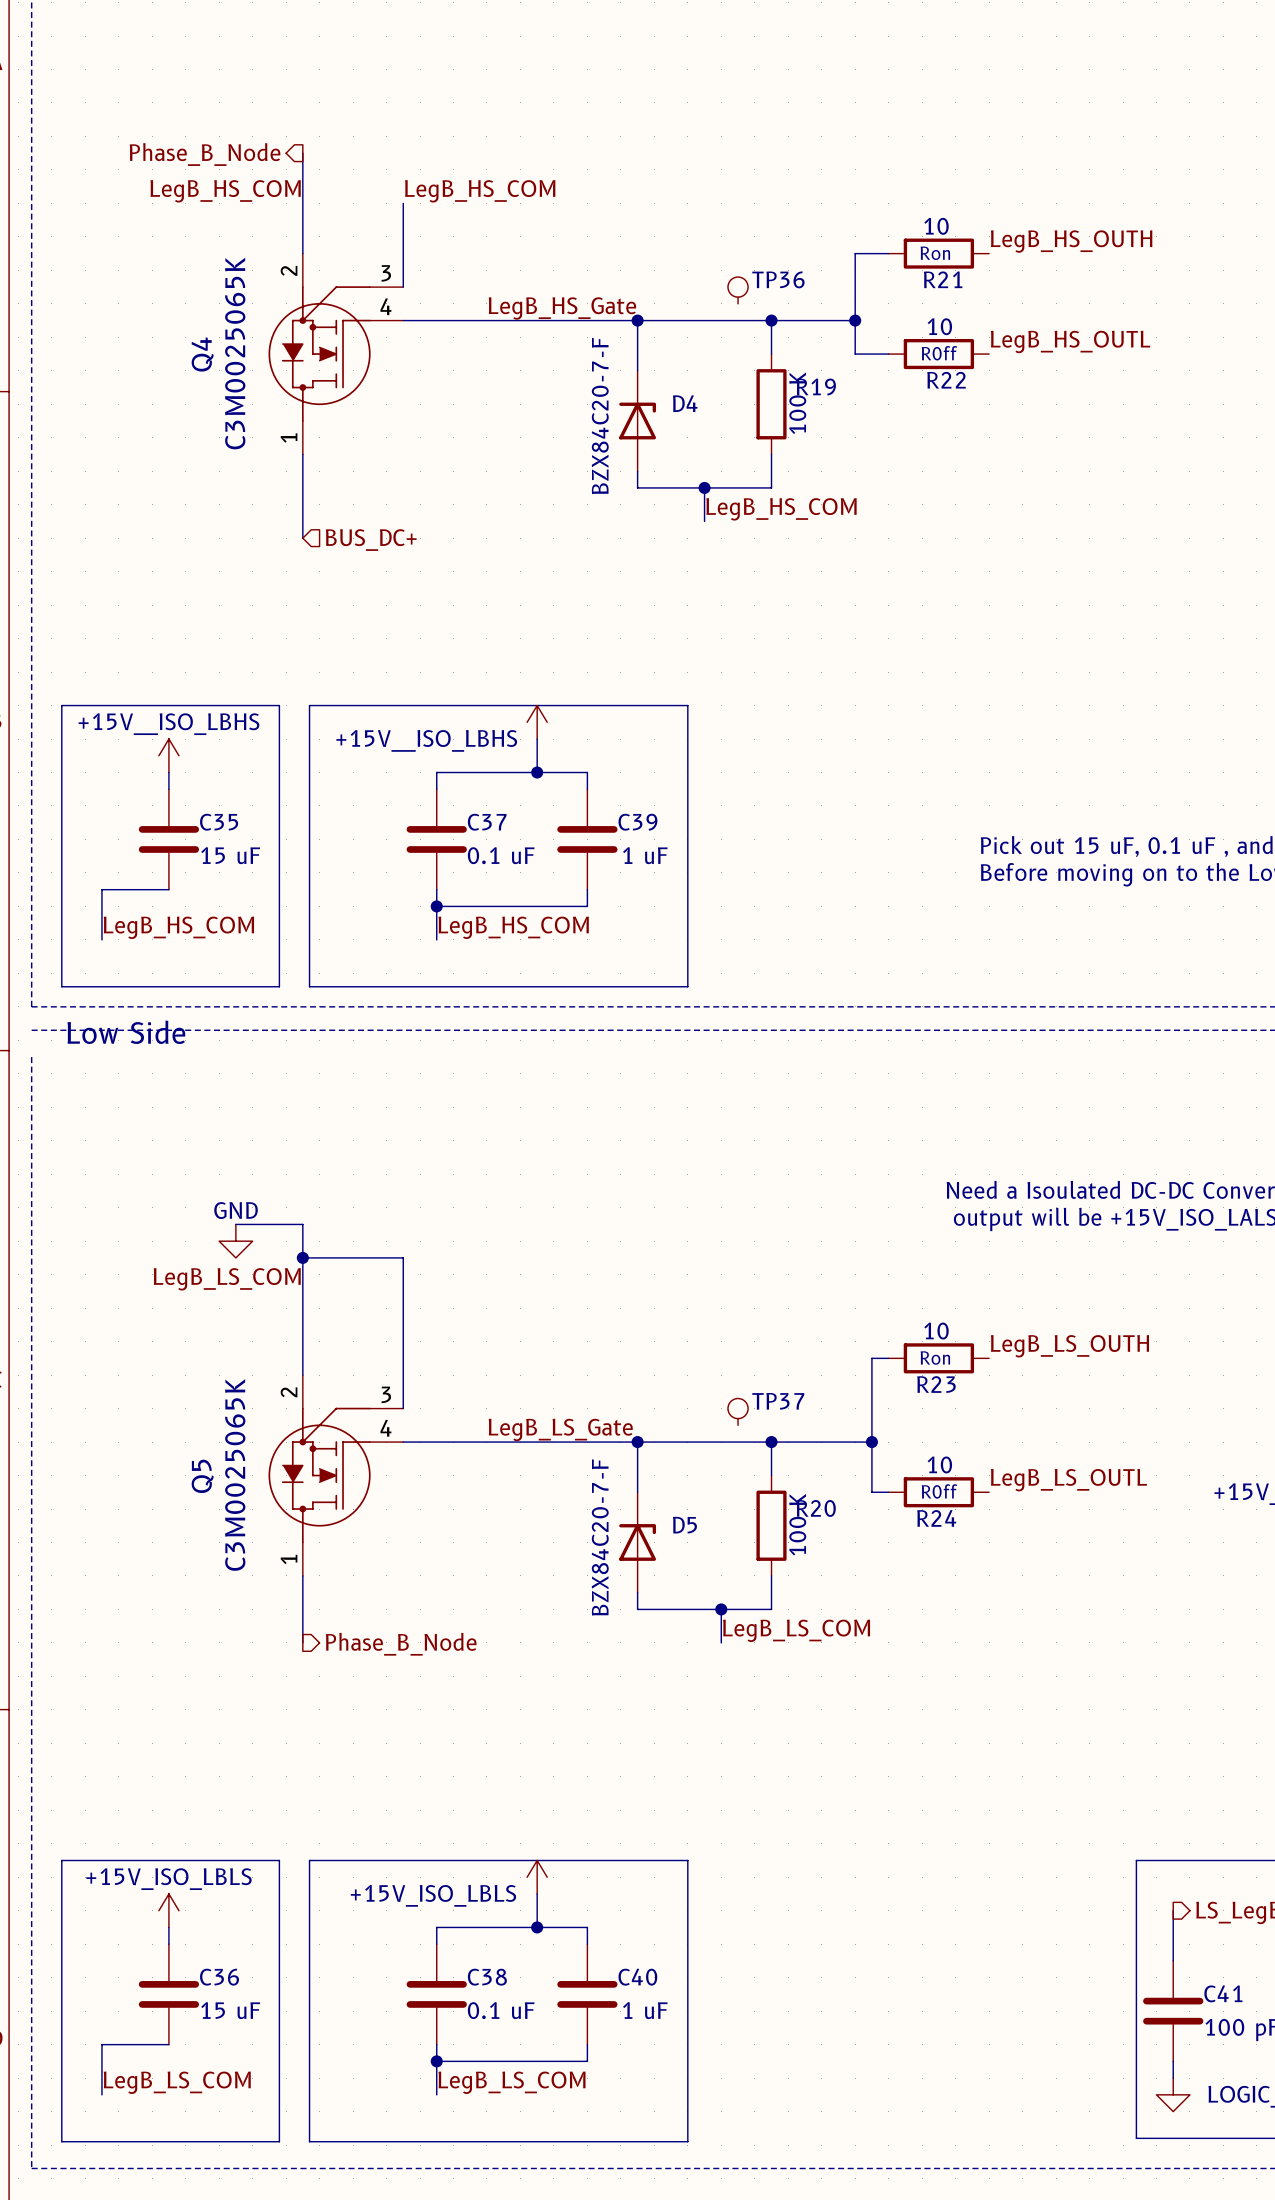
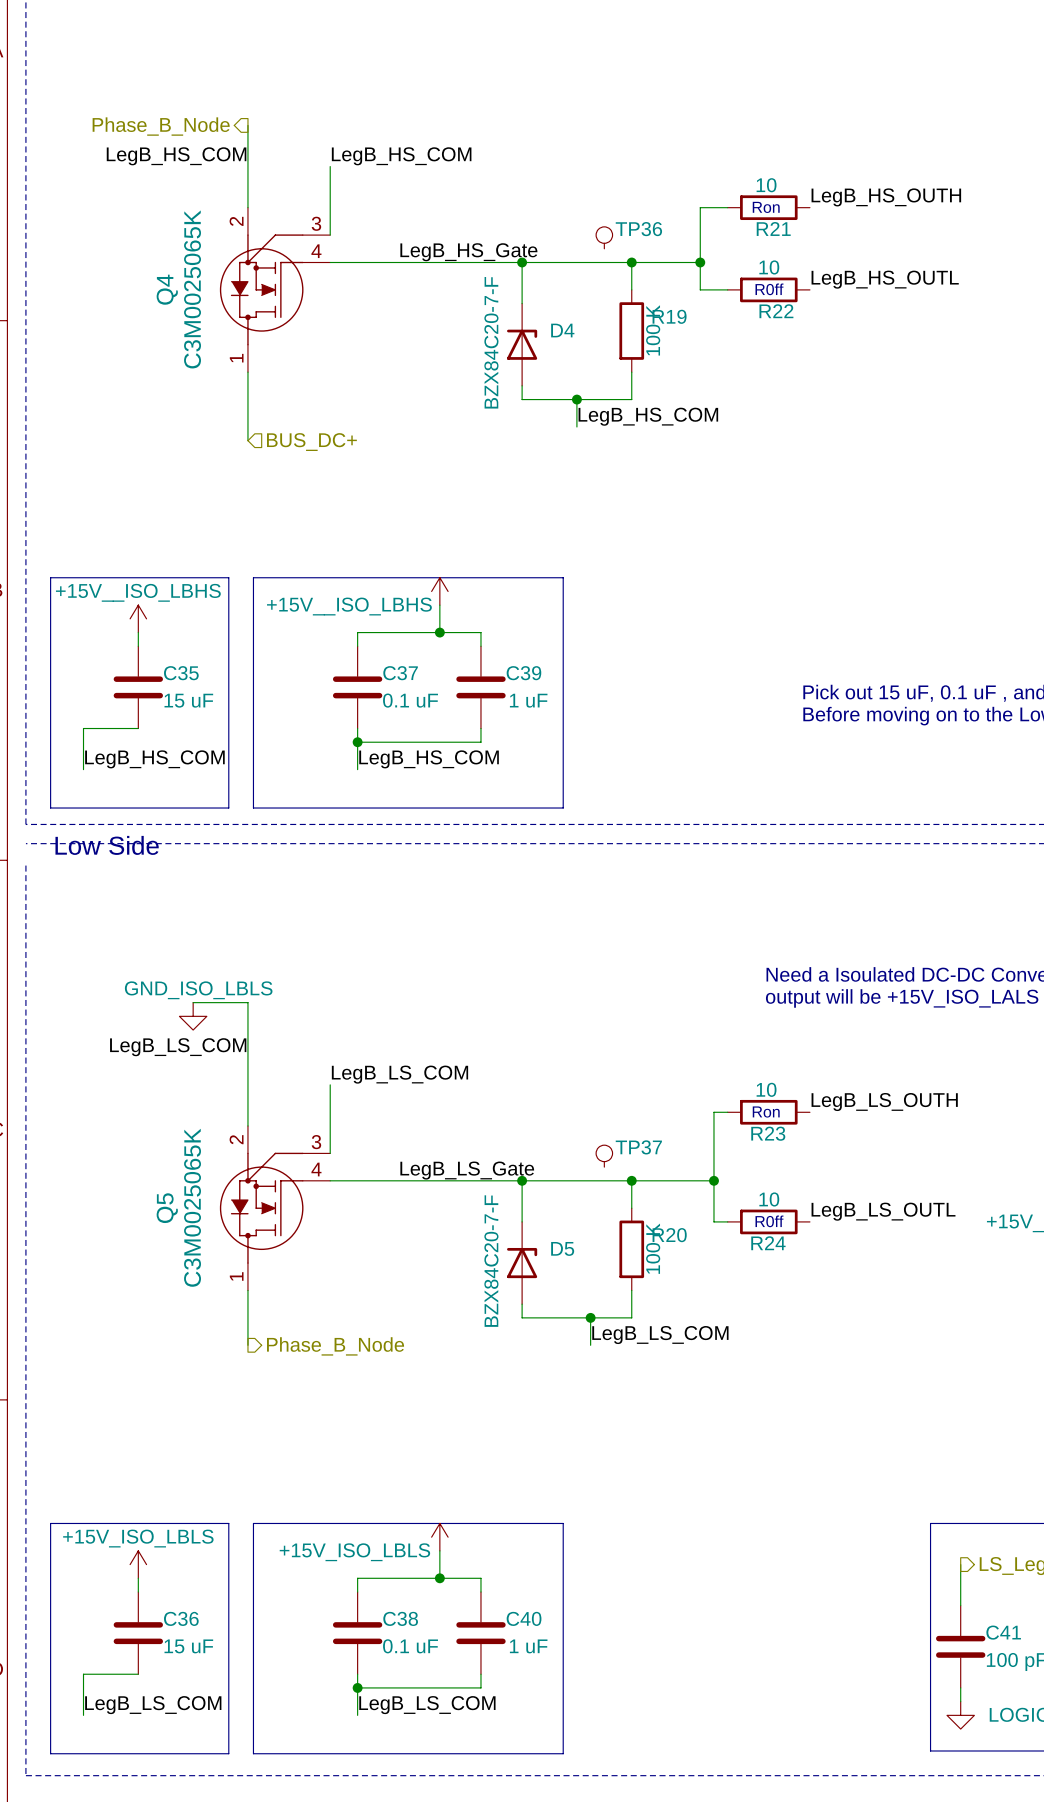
power symbol: GND (235, 1241) -> GND_ISO_LBLS (193, 1016)
wire: (302, 1257) (403, 1257) (403, 1324) -> none
junction: (302, 1257) -> none
label: none -> LegB_LS_COM (399, 1074)

